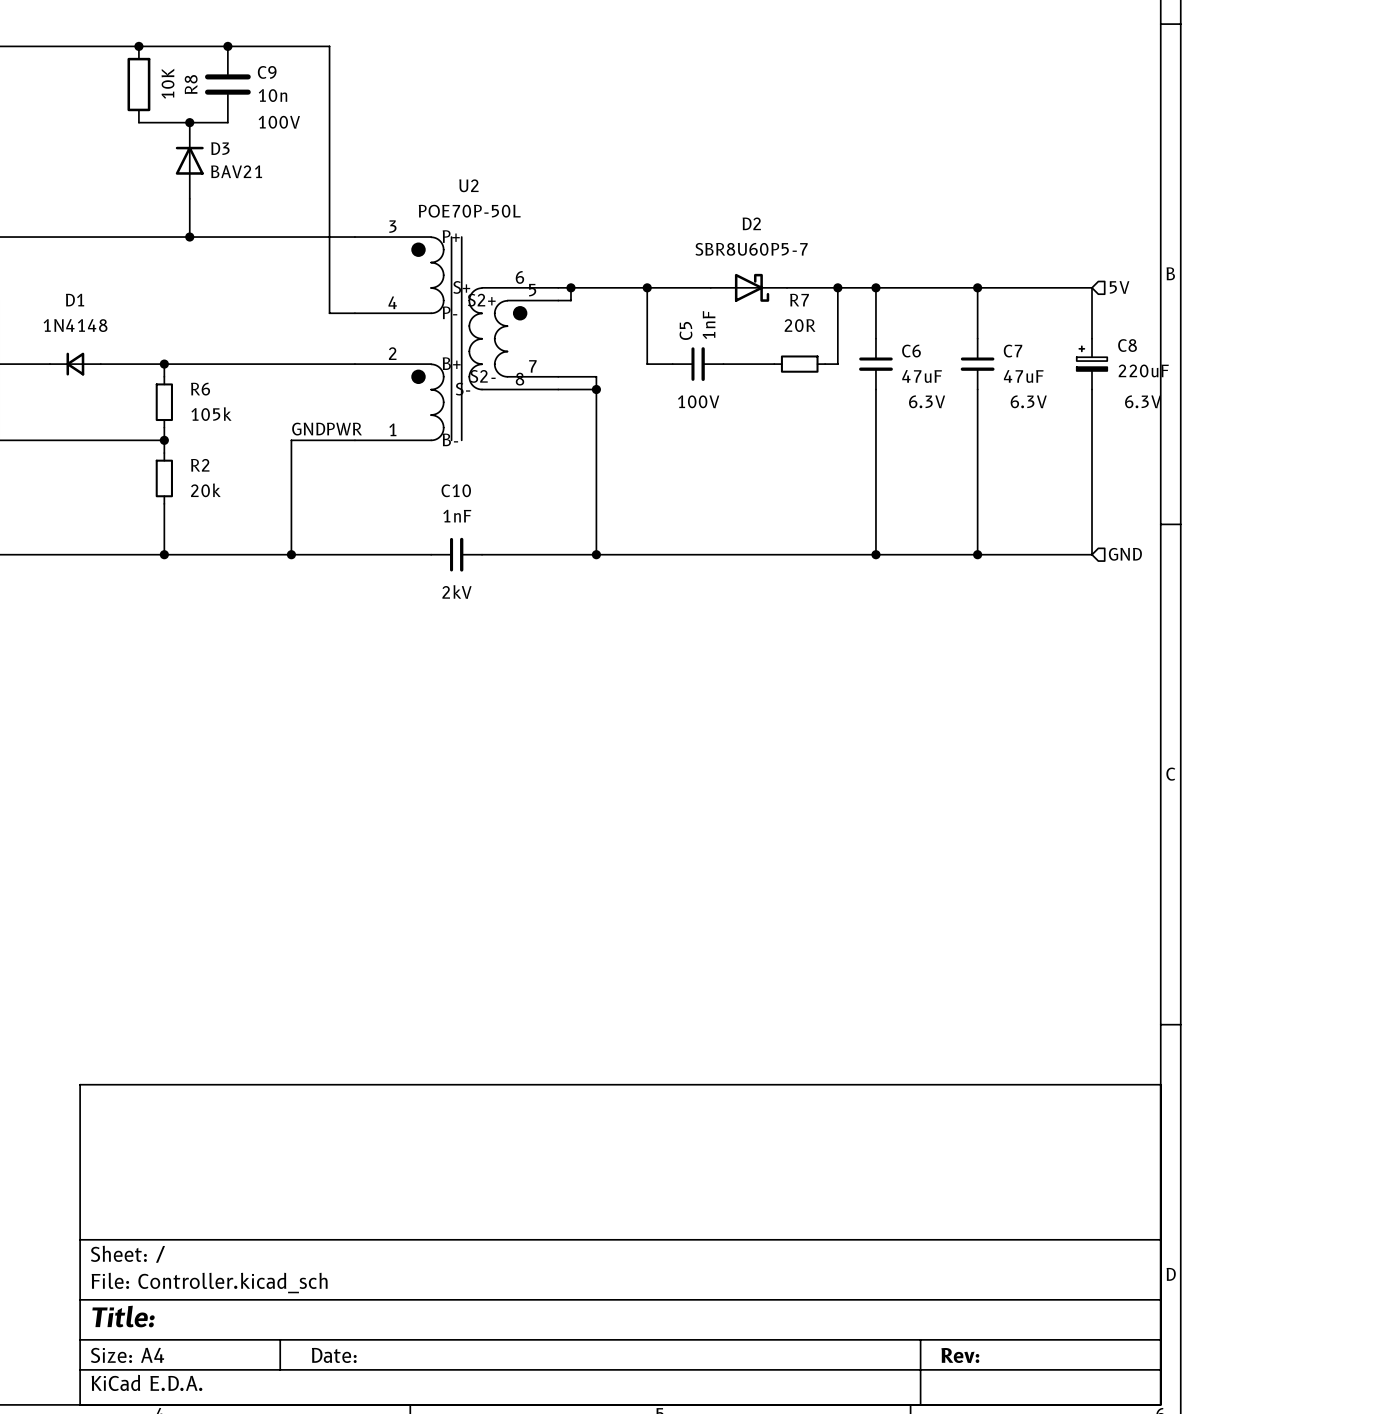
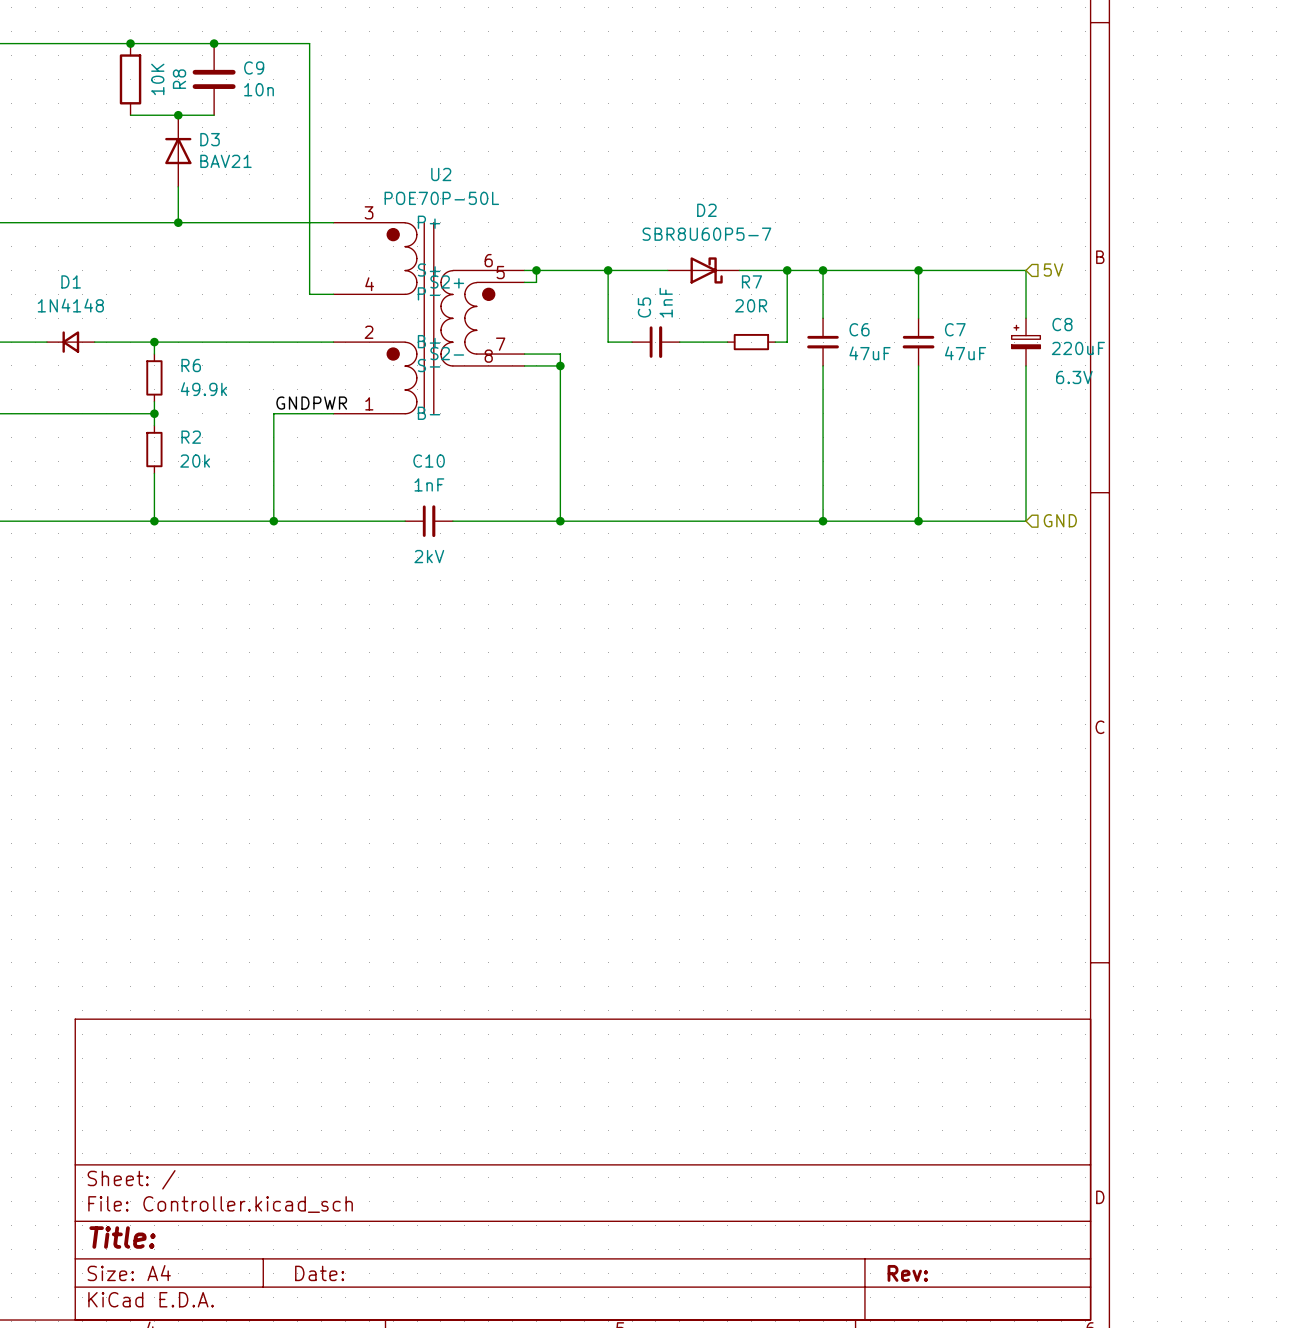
C9 text: 100V (279, 122) -> none
C5 text: 100V (698, 401) -> none
C6 text: 6.3V (927, 401) -> none
C7 text: 6.3V (1028, 401) -> none
R6 value: 105k (211, 414) -> 49.9k (203, 389)

